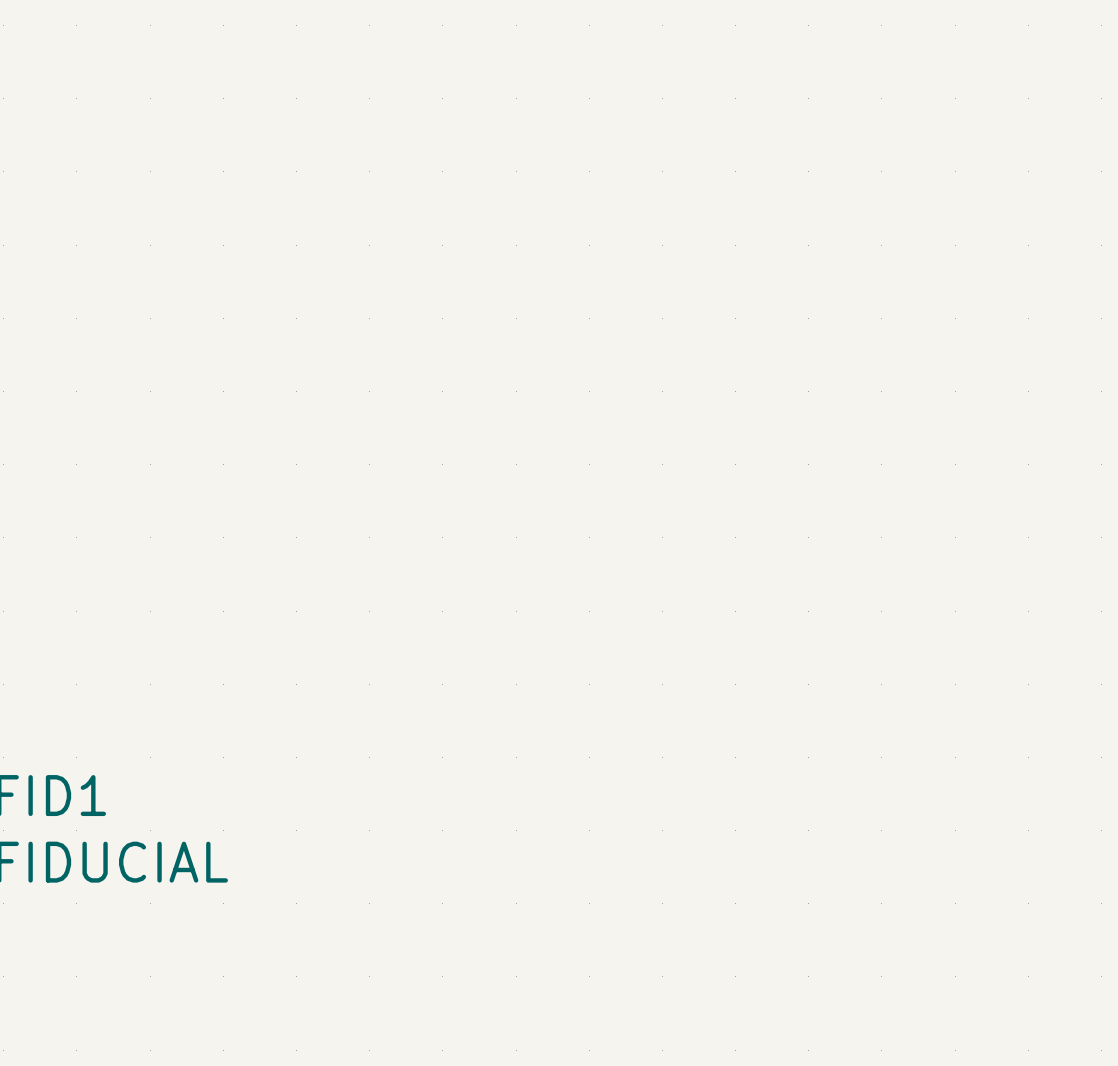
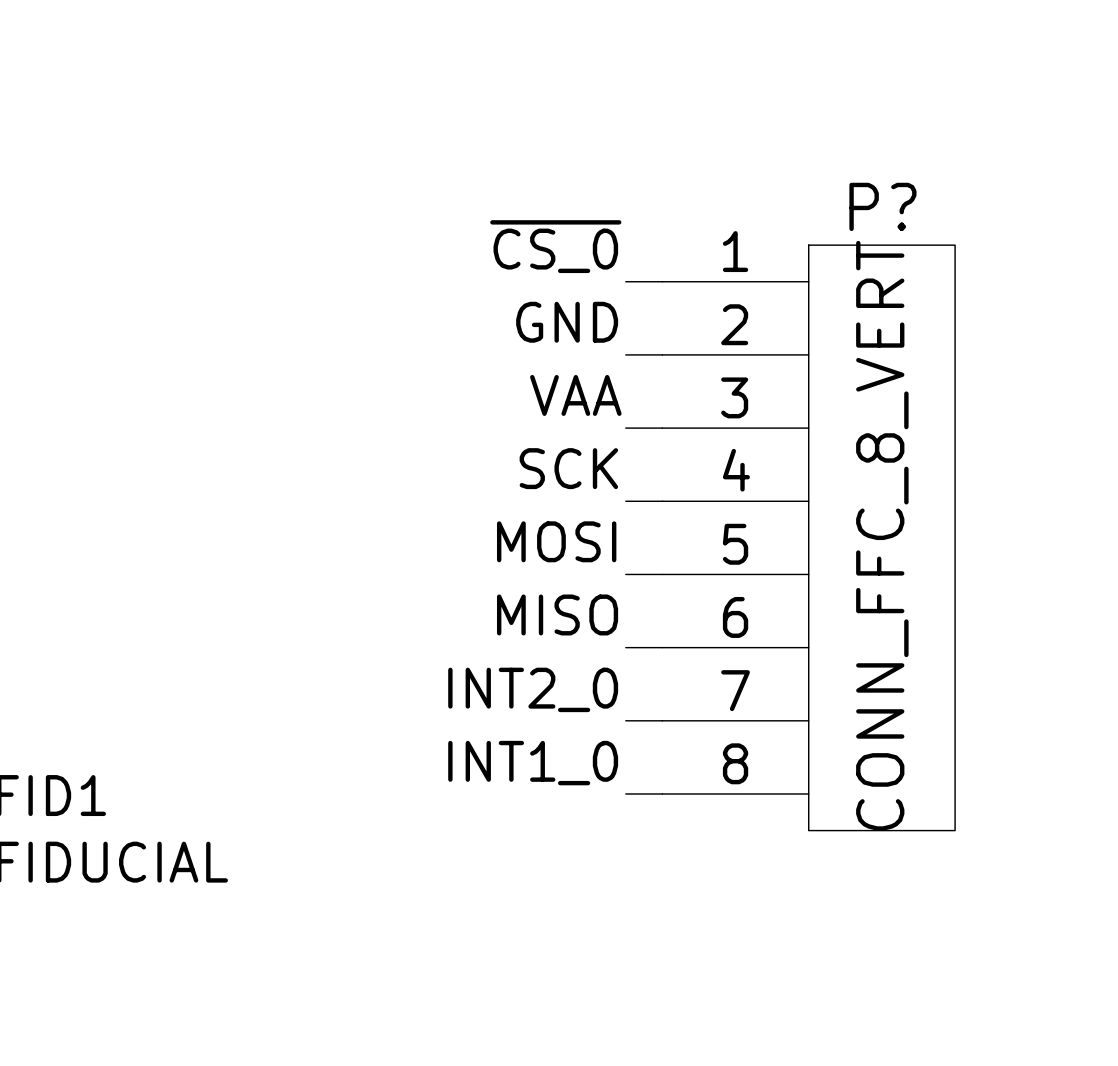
label: none -> ~{CS_0} (555, 246)
wire: none -> (625, 281) (662, 281)
label: none -> GND (567, 322)
wire: none -> (625, 354) (662, 354)
label: none -> VAA (575, 395)
wire: none -> (625, 428) (662, 428)
label: none -> SCK (568, 468)
wire: none -> (625, 501) (662, 501)
P?: none -> CONN_FFC_8_VERT (808, 537)
label: none -> MOSI (556, 541)
wire: none -> (625, 574) (662, 574)
label: none -> MISO (557, 614)
wire: none -> (625, 647) (662, 647)
label: none -> INT2_0 (533, 689)
wire: none -> (625, 720) (662, 720)
label: none -> INT1_0 (533, 763)
wire: none -> (625, 793) (662, 793)

